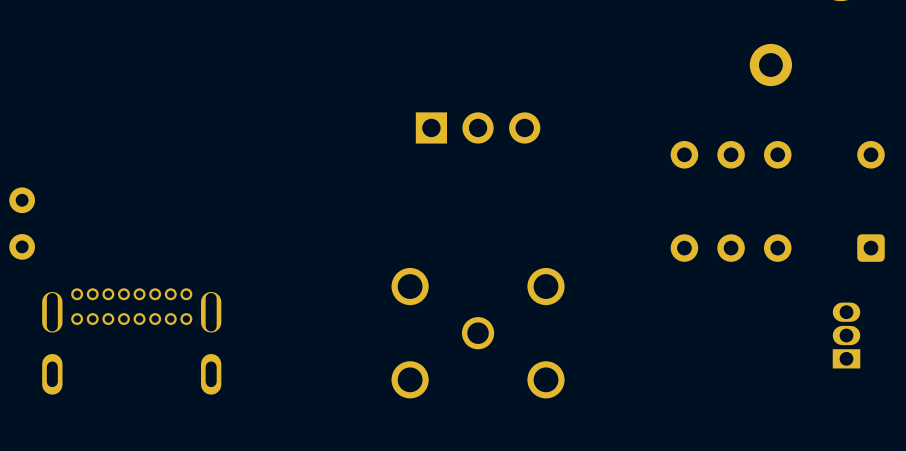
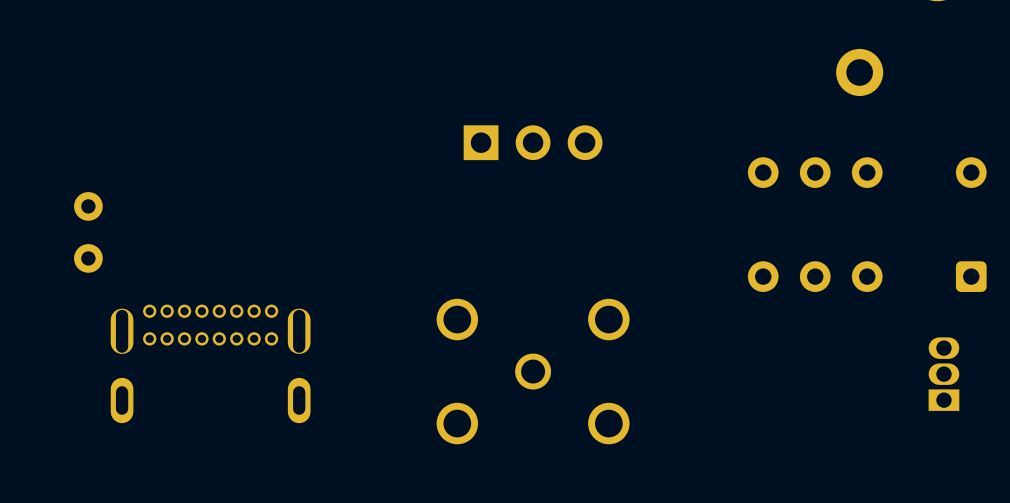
part position: (22, 223) -> (88, 232)
part position: (131, 341) -> (210, 363)

